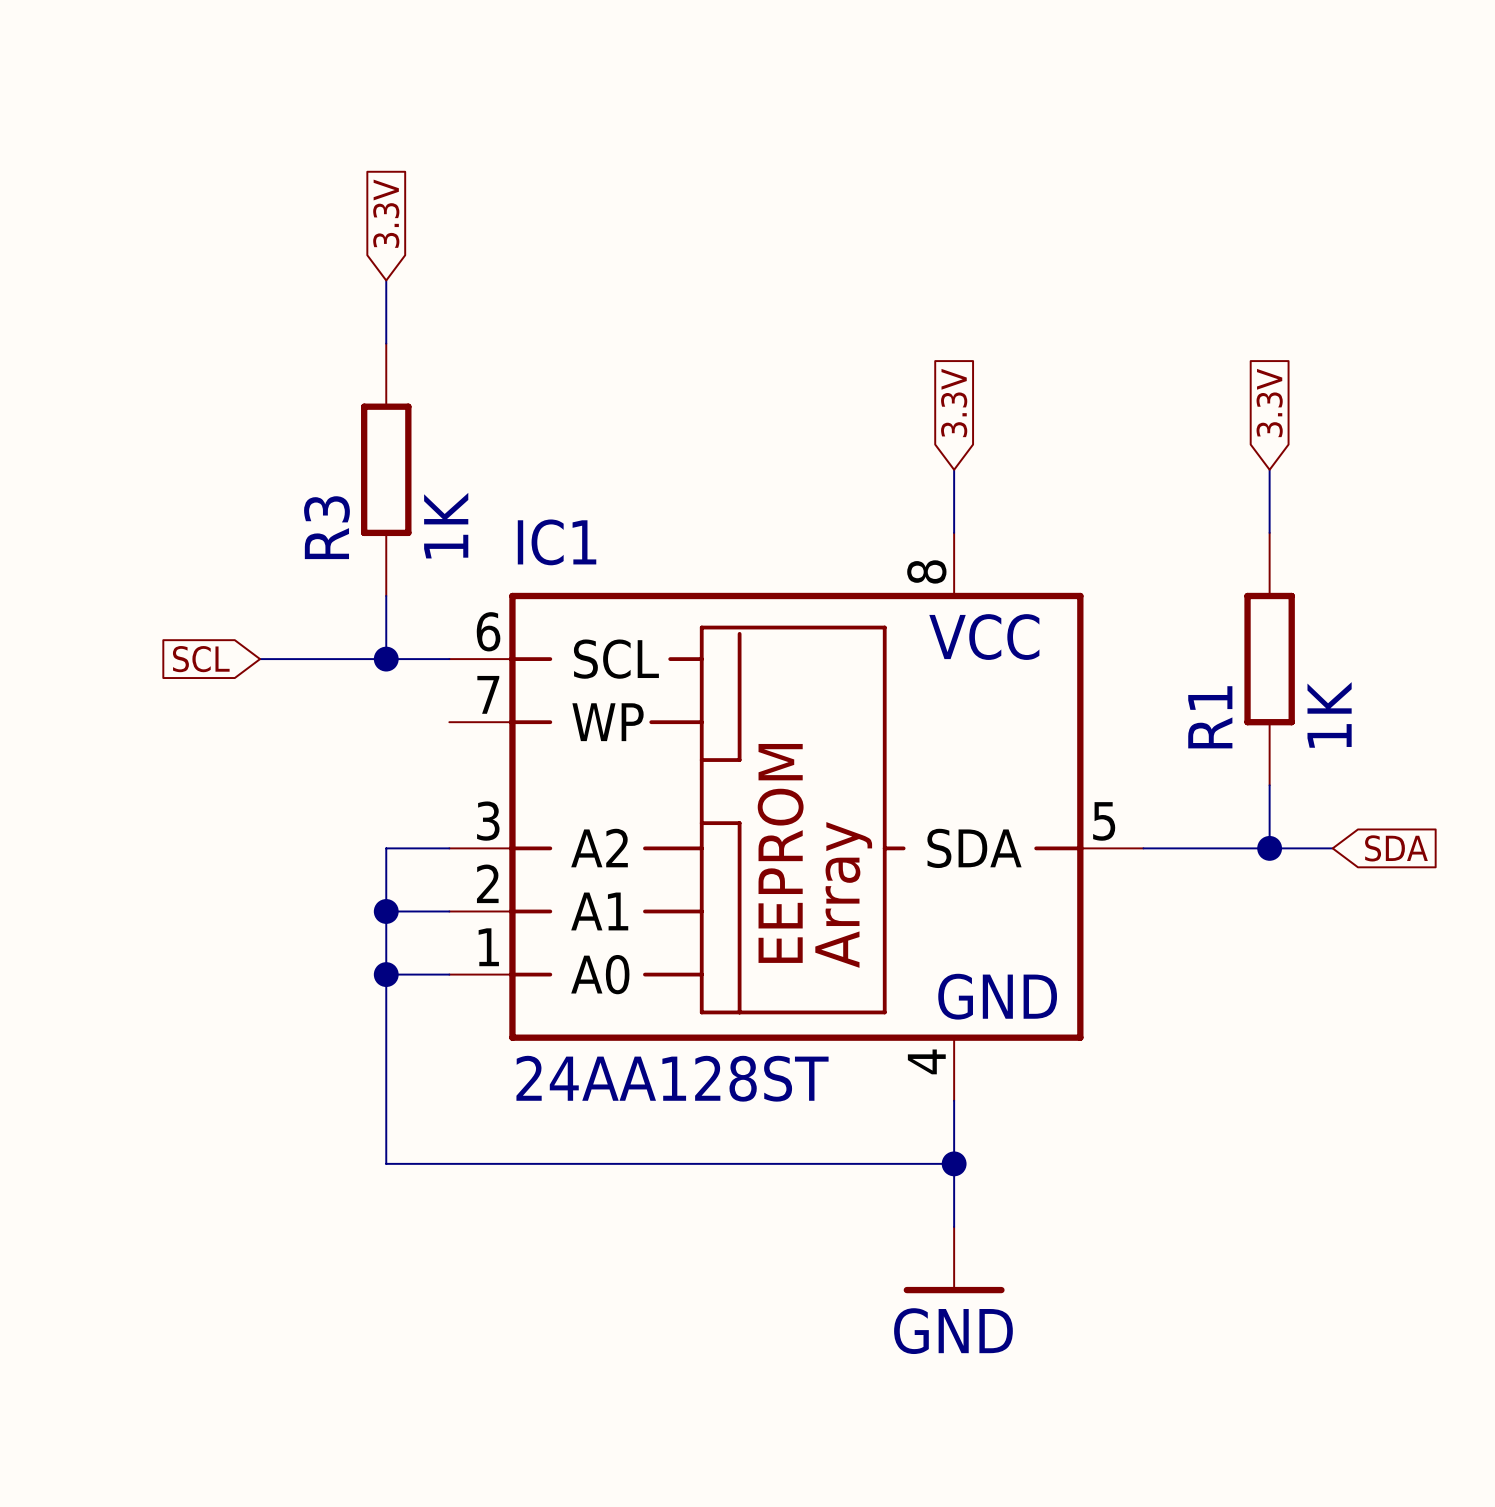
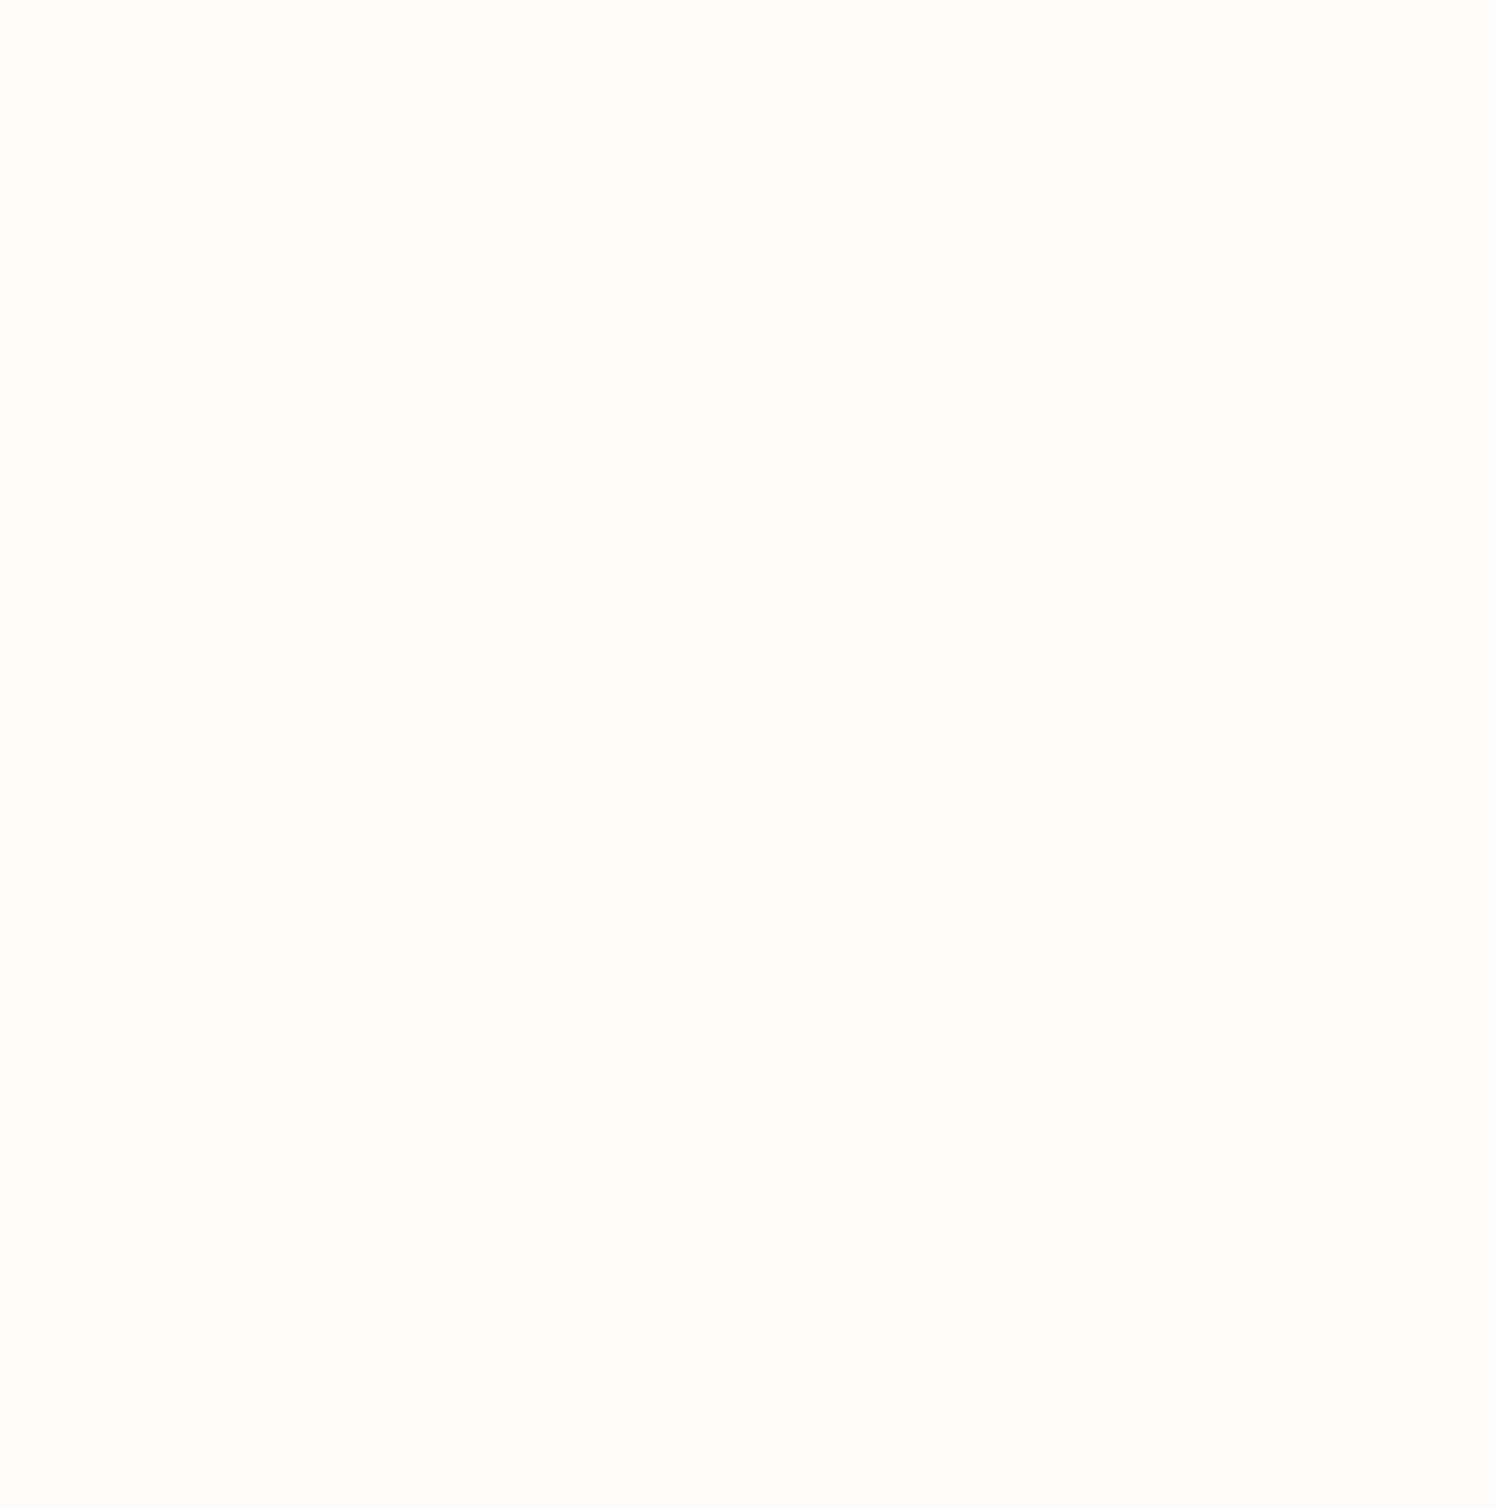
global label: 3.3V (386, 213) -> none
wire: (386, 280) (386, 343) -> none
global label: 3.3V (954, 403) -> none
global label: 3.3V (1269, 403) -> none
R3: 1K (386, 469) -> none
wire: (954, 469) (954, 532) -> none
wire: (1269, 469) (1269, 532) -> none
wire: (386, 595) (386, 659) -> none
global label: SCL (201, 659) -> none
wire: (260, 659) (449, 659) -> none
junction: (386, 659) -> none
R1: 1K (1269, 659) -> none
wire: (1269, 785) (1269, 848) -> none
IC1: 24AA128ST (796, 816) -> none
wire: (449, 848) (386, 848) (386, 1163) (954, 1163) -> none
wire: (1143, 848) (1332, 848) -> none
junction: (1269, 848) -> none
global label: SDA (1396, 848) -> none
wire: (386, 911) (449, 911) -> none
junction: (386, 911) -> none
wire: (386, 974) (449, 974) -> none
junction: (386, 974) -> none
wire: (954, 1100) (954, 1226) -> none
junction: (954, 1163) -> none
power symbol: GND (954, 1260) -> none

